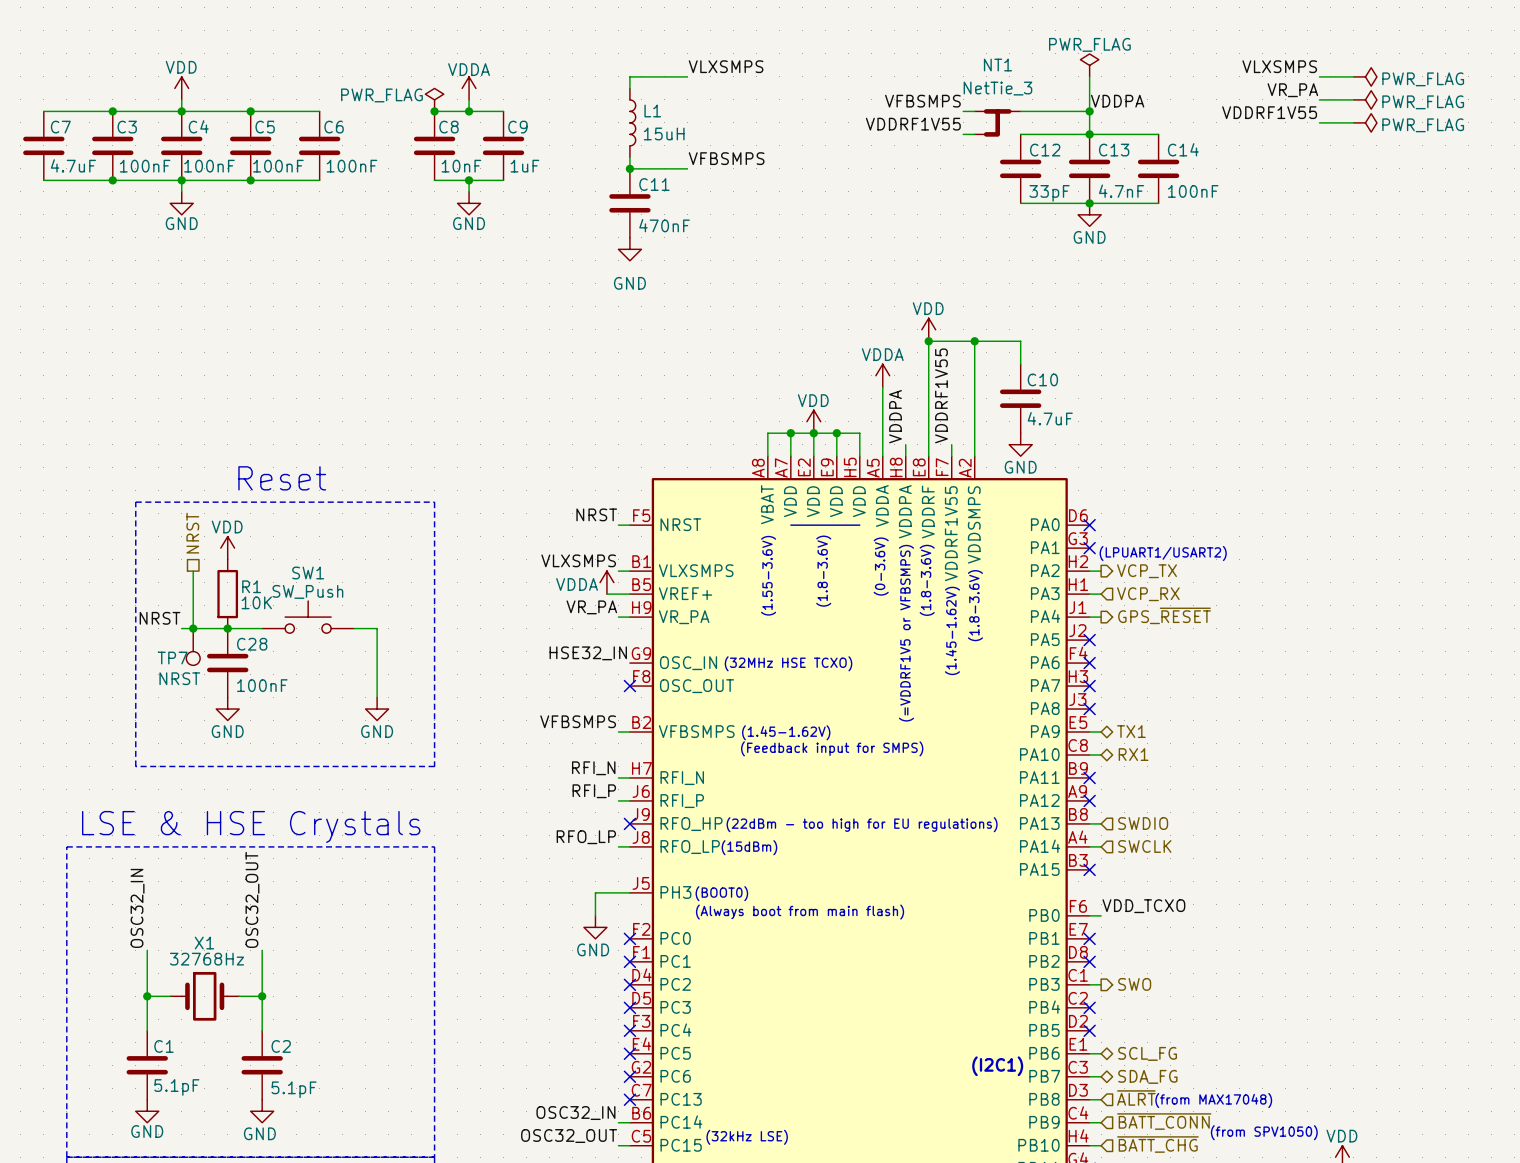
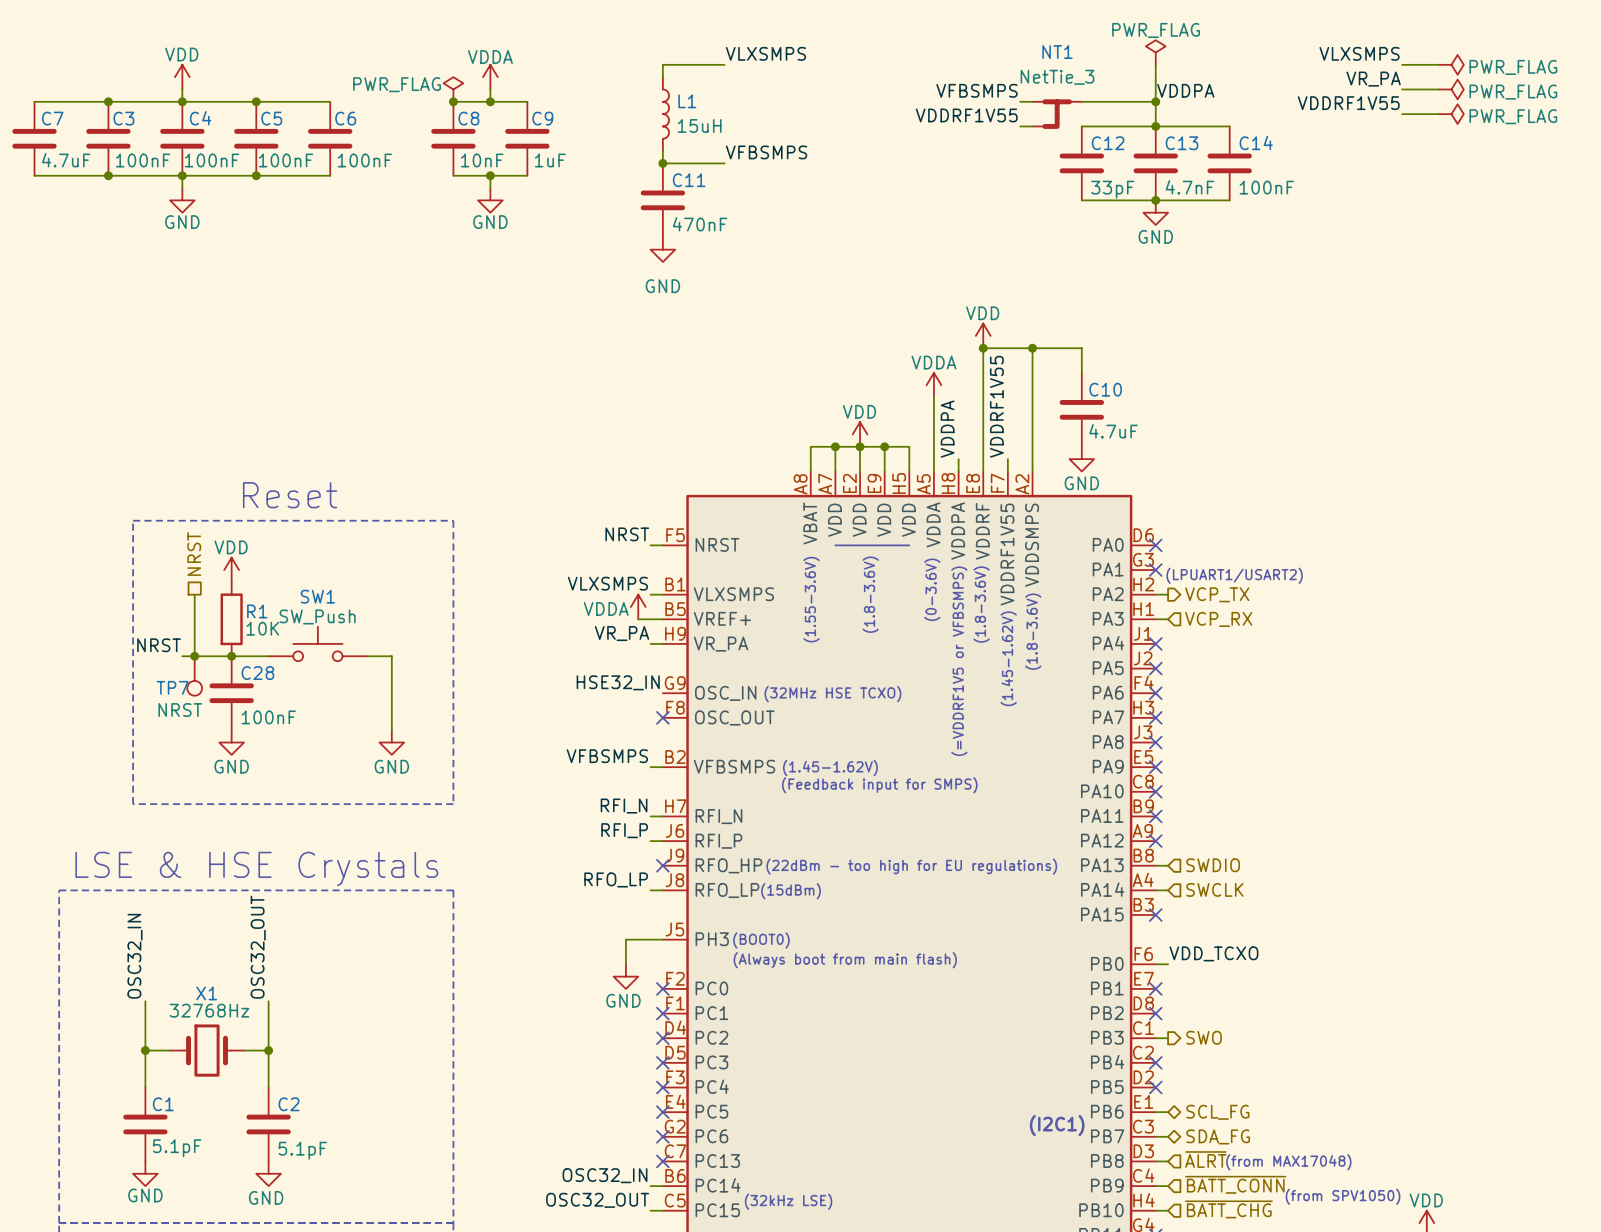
hierarchical label: GPS_~{RESET} (1164, 615) -> none
wire: (1089, 617) (1101, 617) -> none
no-connect mark: none -> (1155, 643)
hierarchical label: TX1 (1131, 731) -> none
wire: (1089, 732) (1101, 732) -> none
no-connect mark: none -> (1155, 767)
wire: (1089, 754) (1101, 754) -> none
no-connect mark: none -> (1155, 791)
hierarchical label: RX1 (1133, 754) -> none

